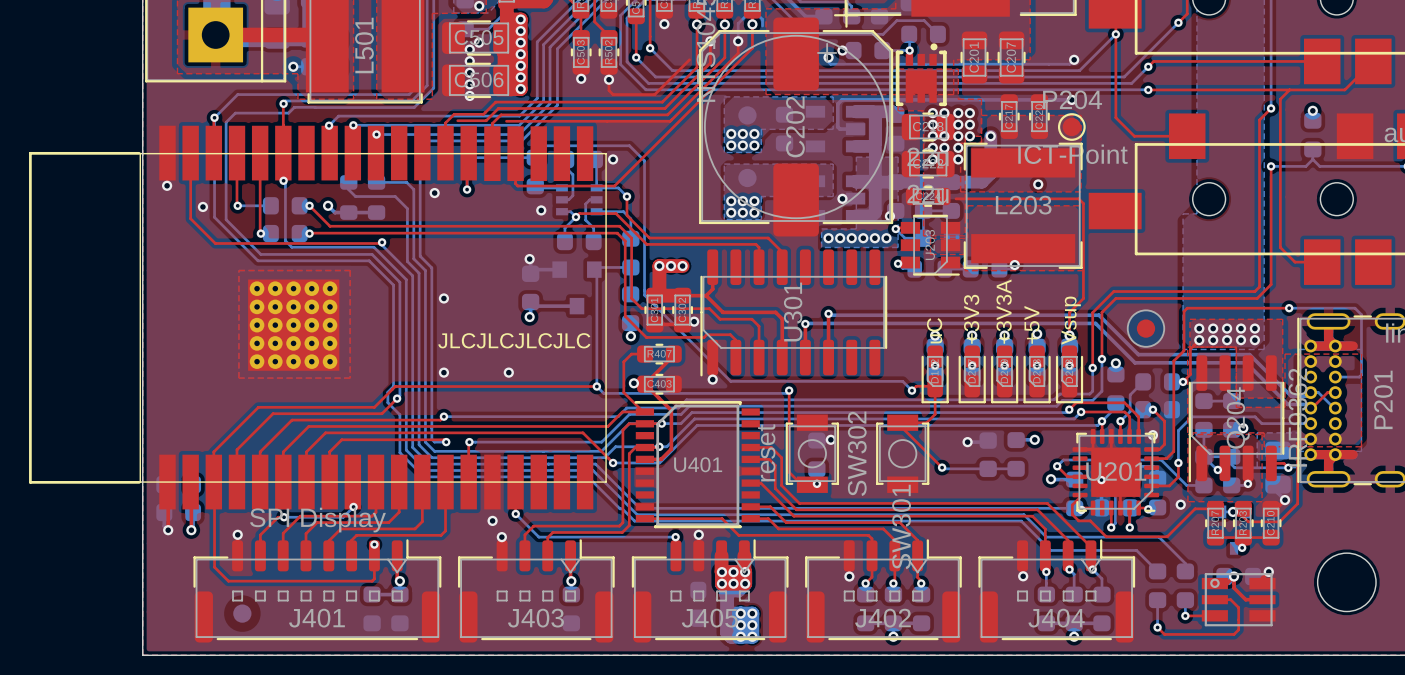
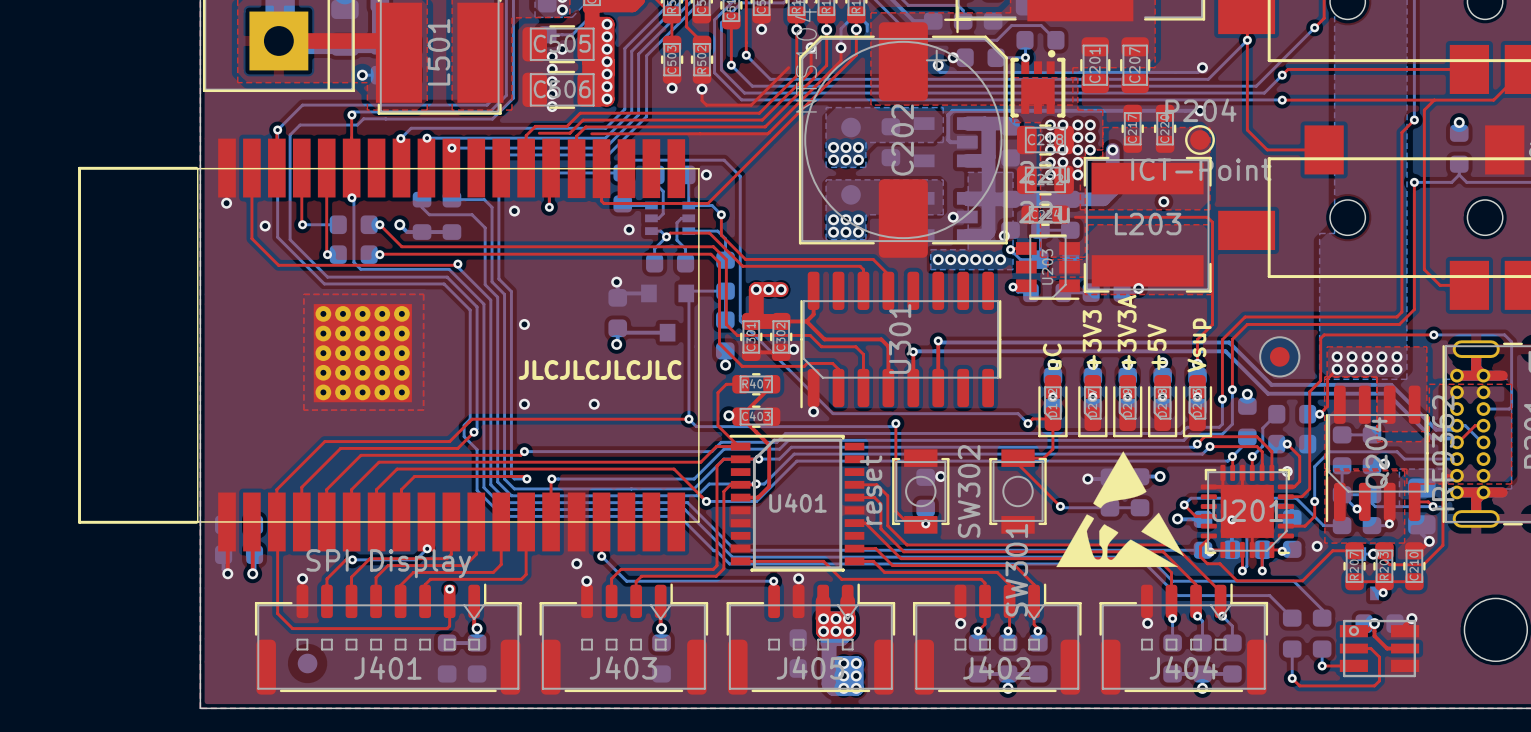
drawing: none -> [1056, 451, 1184, 568]

